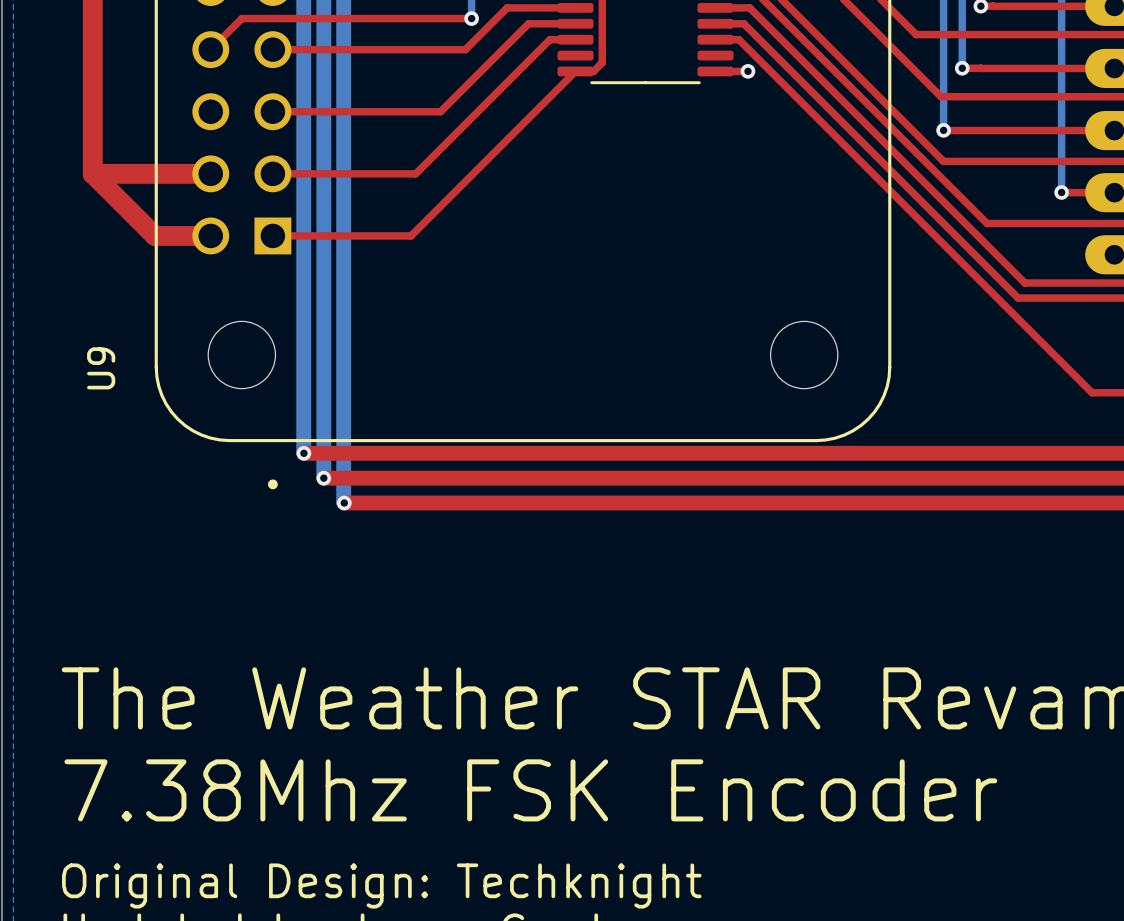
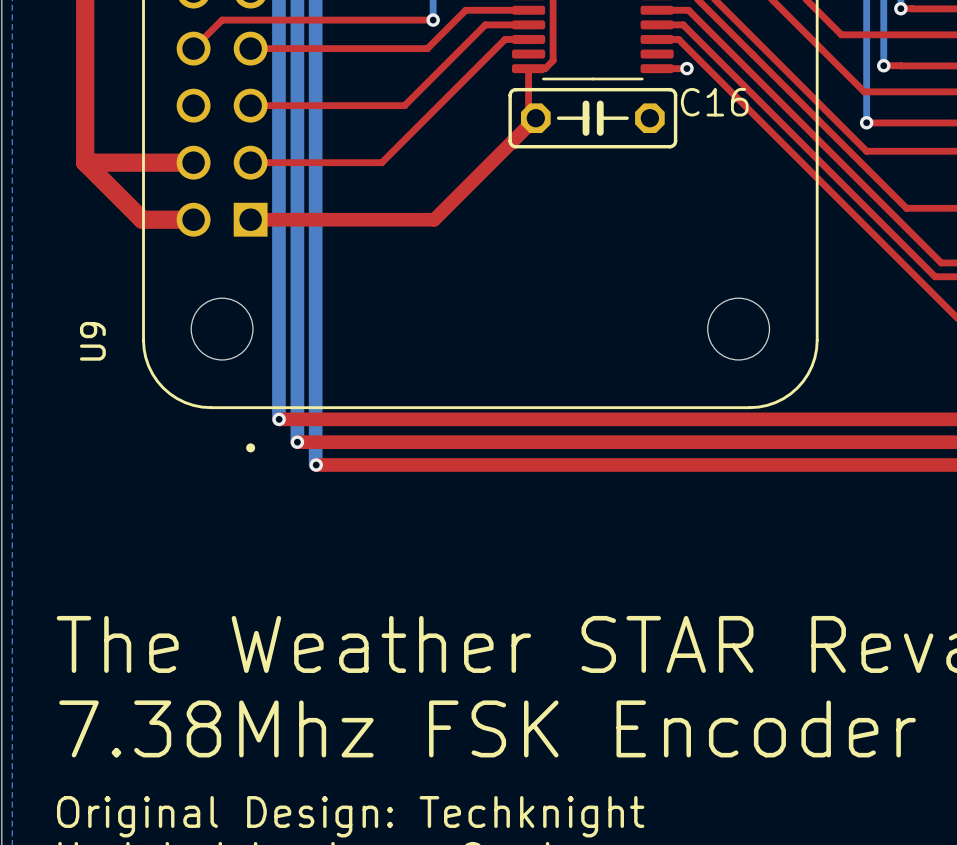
top track: (575, 71) (411, 235) -> (528, 68) (528, 110) (535, 118) (434, 219) (377, 219)
C16: none -> (592, 118)
top track width: thin (272, 235) (411, 235) -> thick (250, 219) (377, 219)

